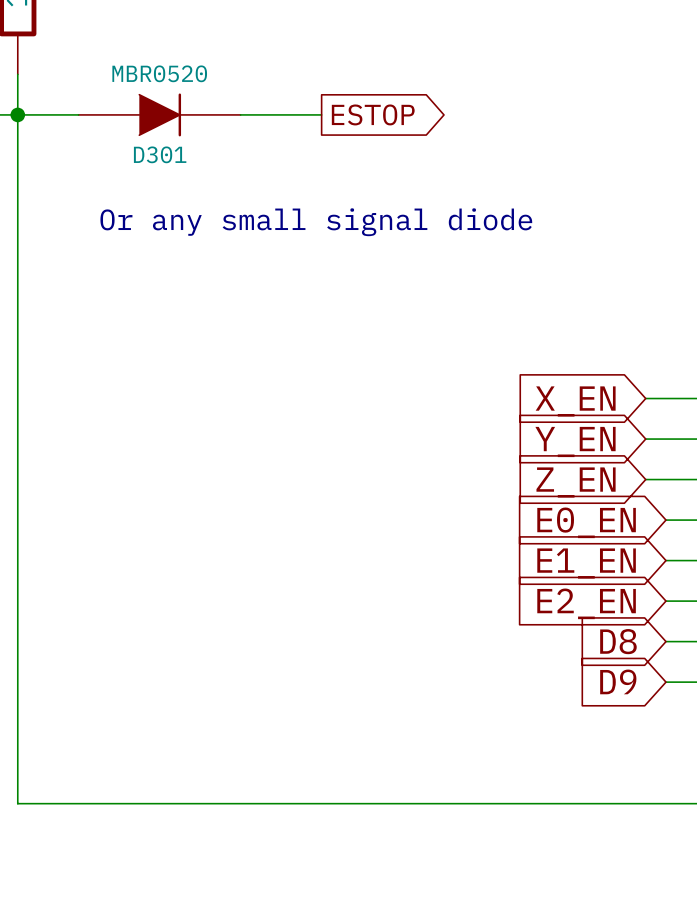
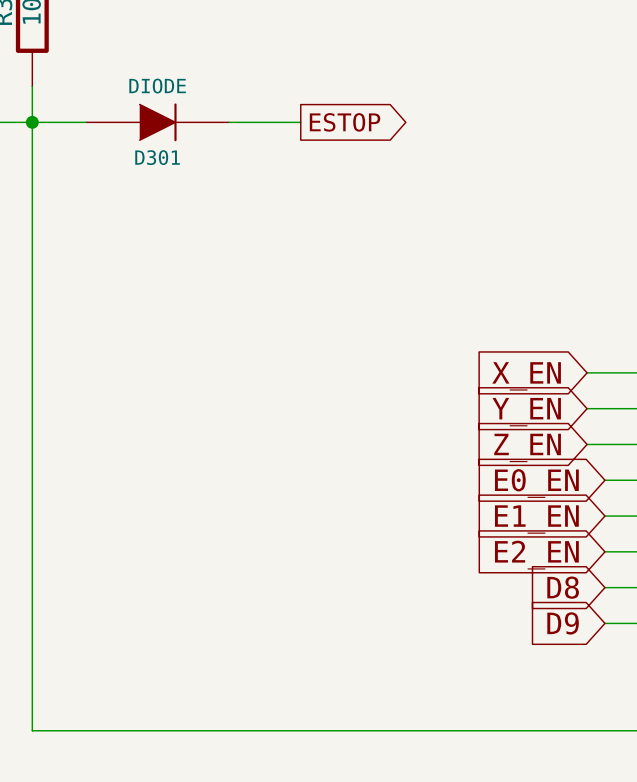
D301 value: MBR0520 (159, 73) -> DIODE (157, 86)
text: Or any small signal diode (316, 222) -> none

